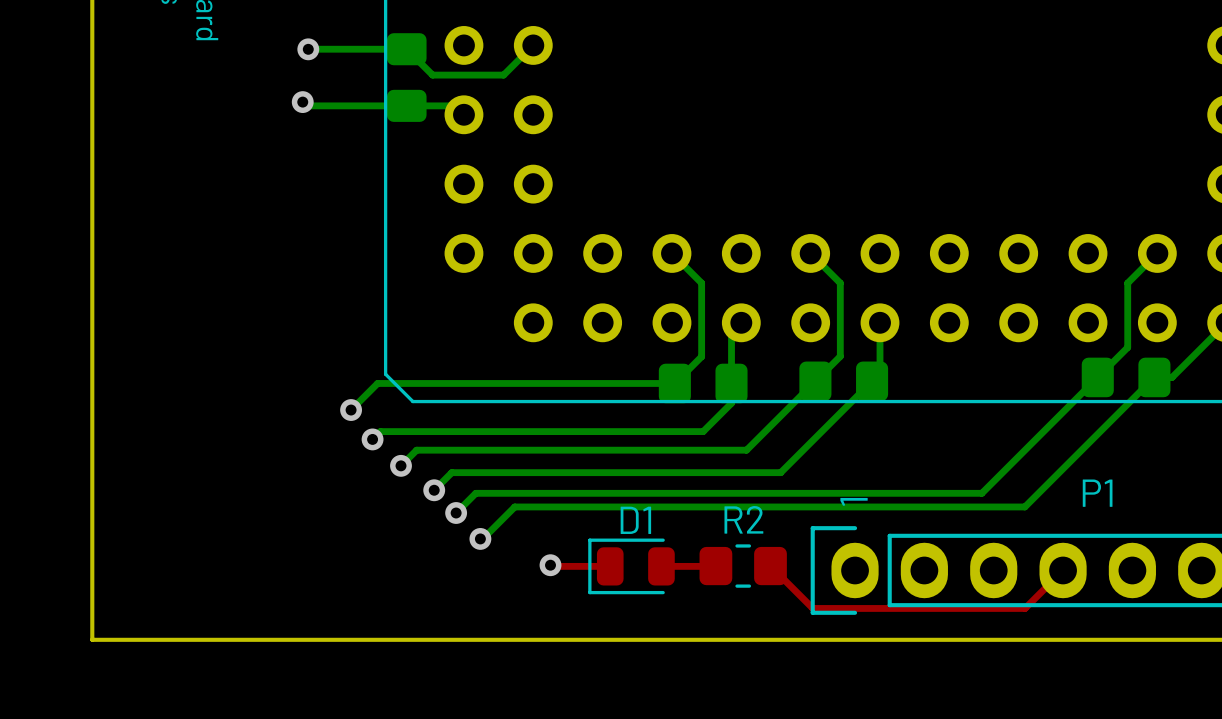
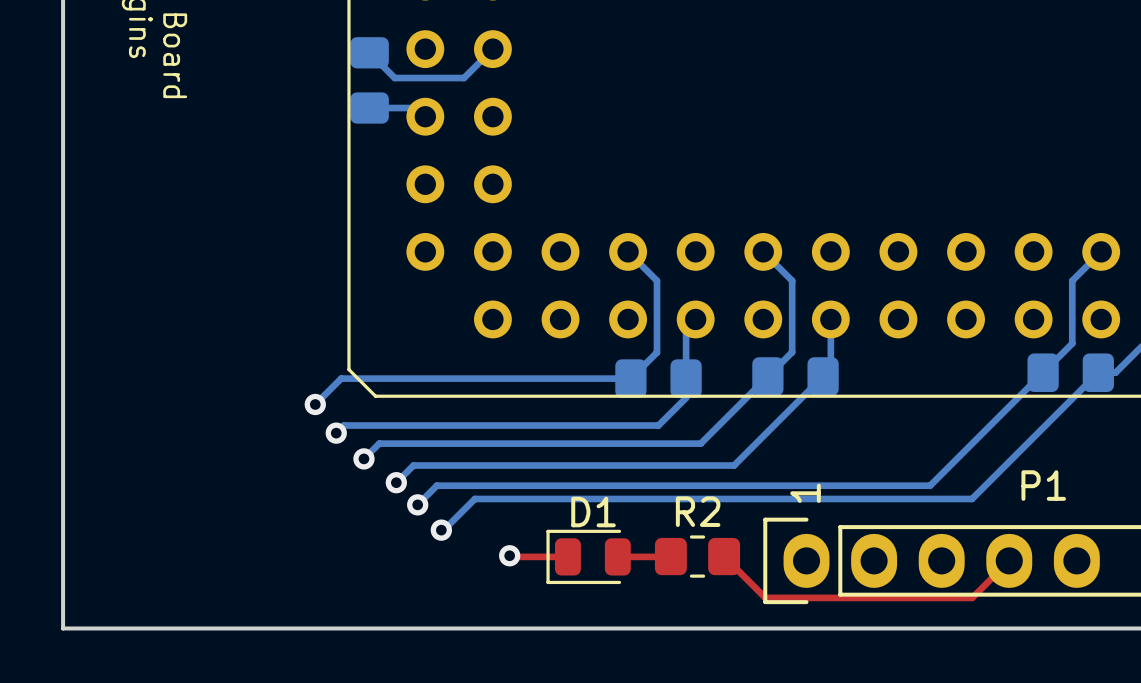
bottom track: (308, 49) (406, 49) -> none
via: (308, 49) -> none
bottom track: (302, 102) (306, 105) (406, 105) -> none
via: (302, 102) -> none

